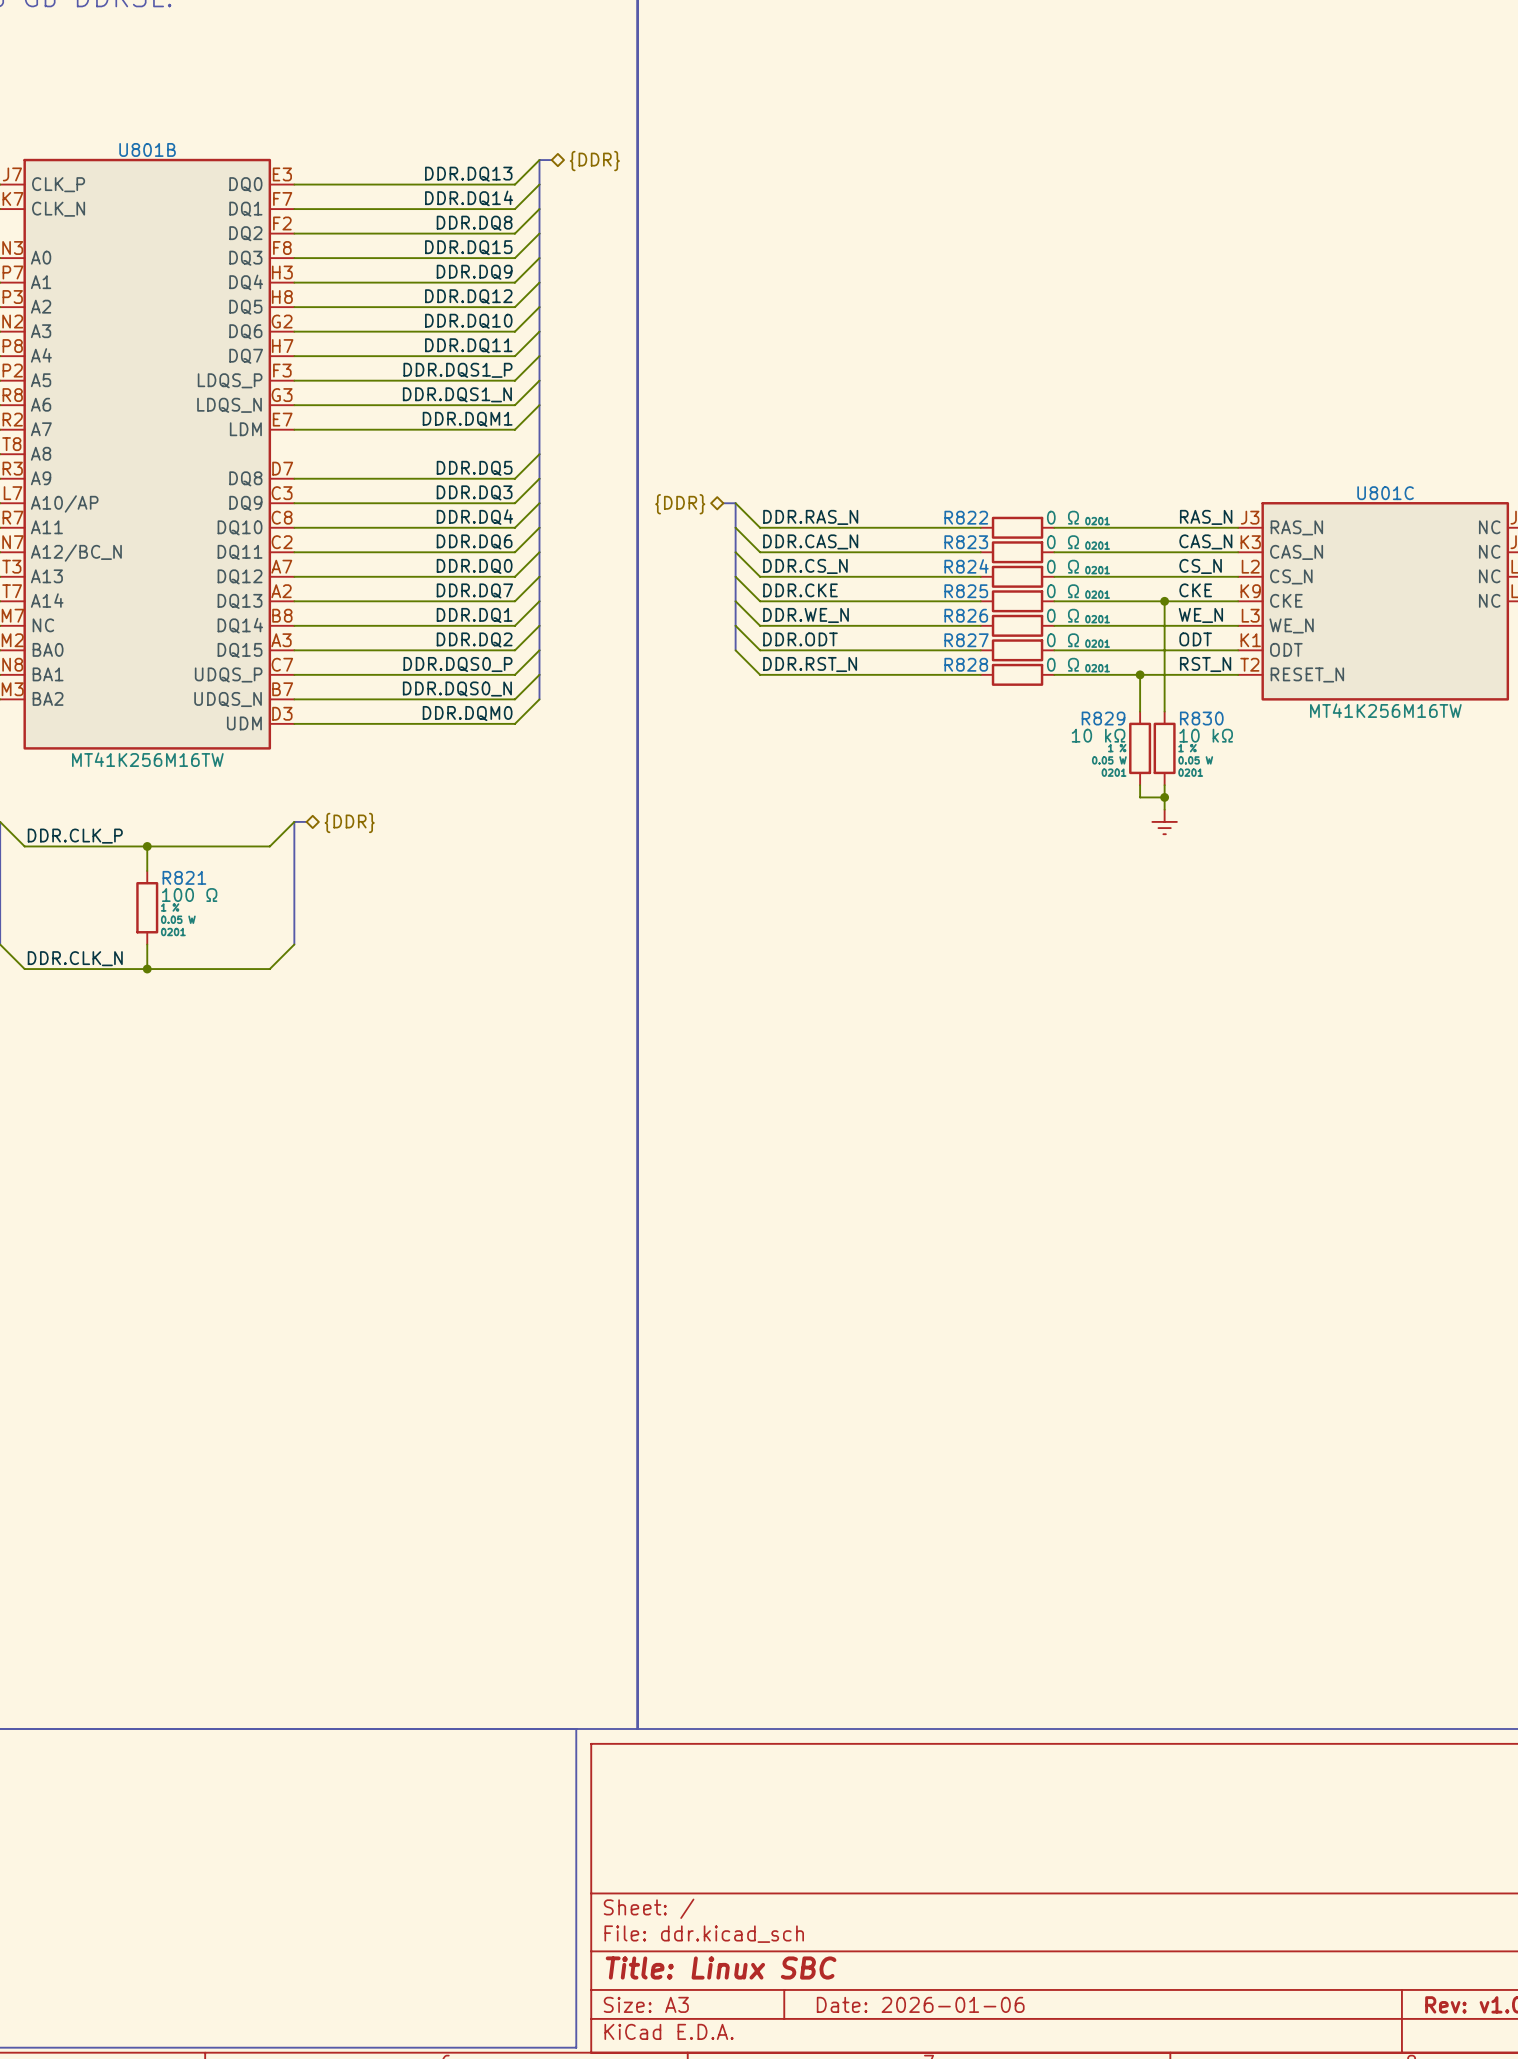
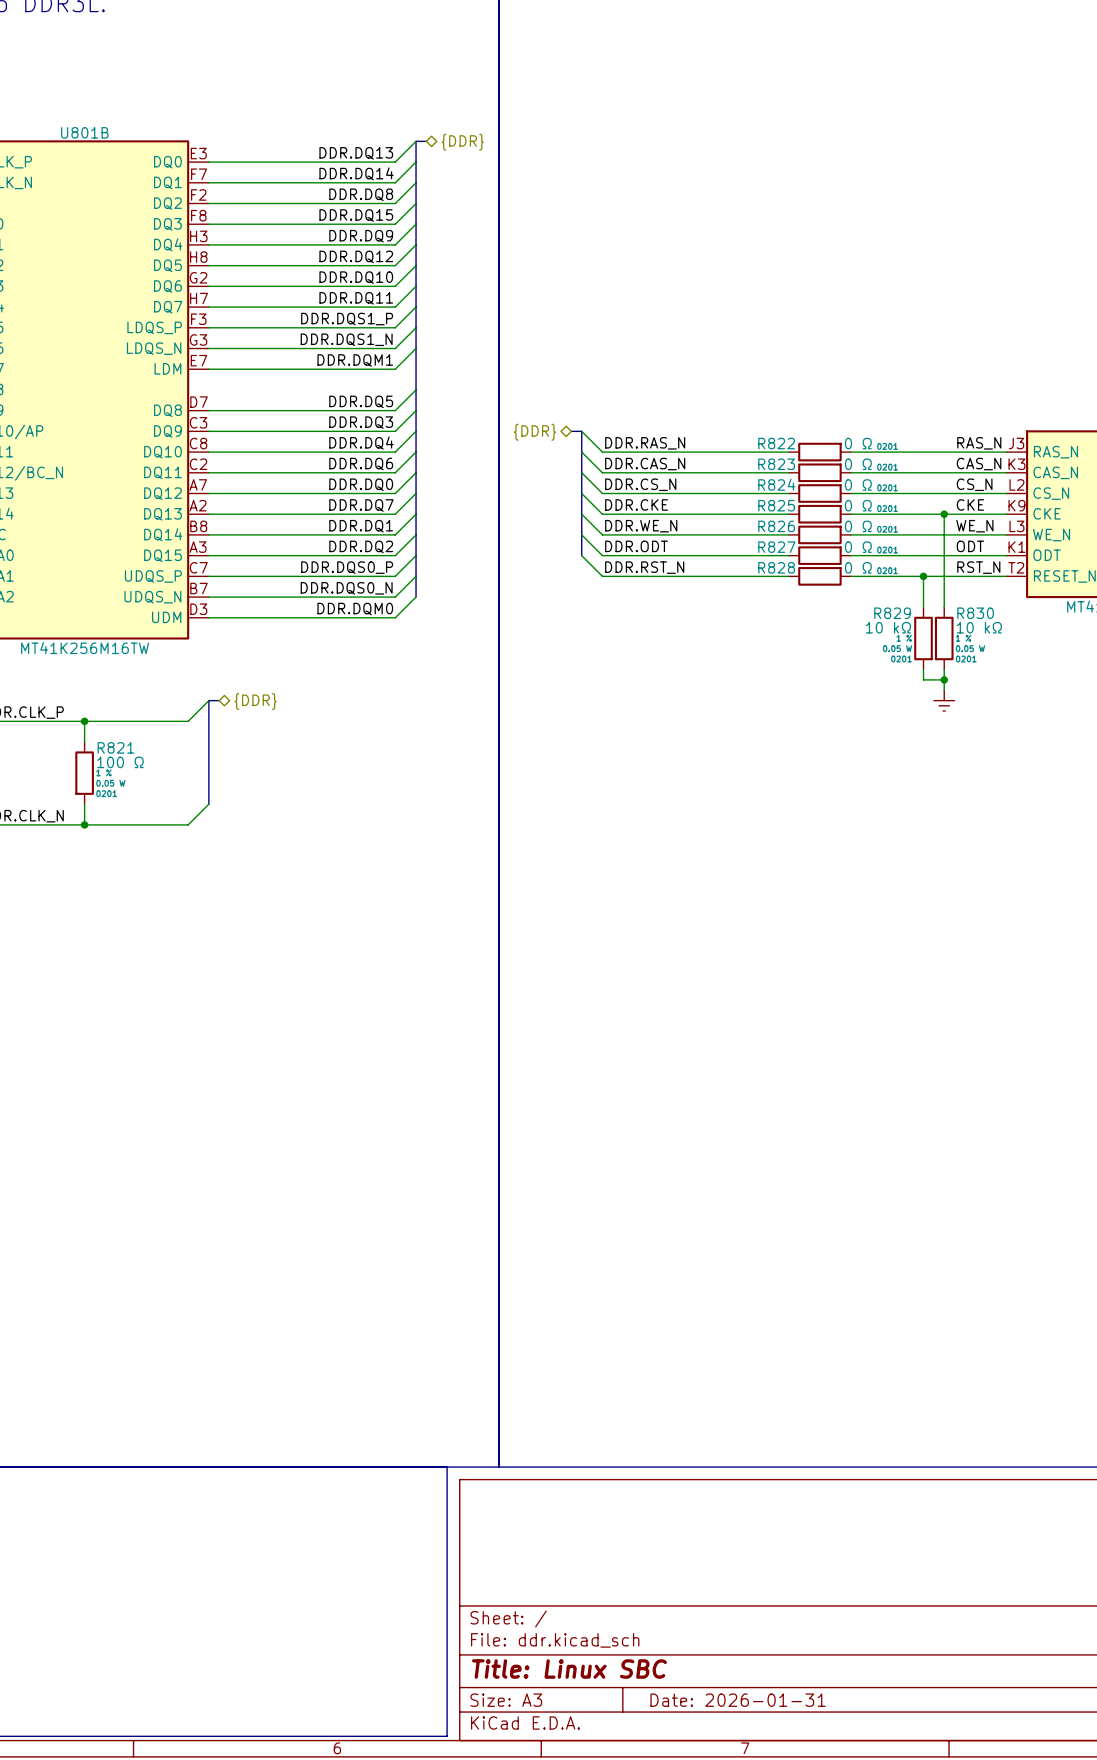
title block: Date: 2026-01-06 (920, 2004) -> Date: 2026-01-31 (738, 1700)

